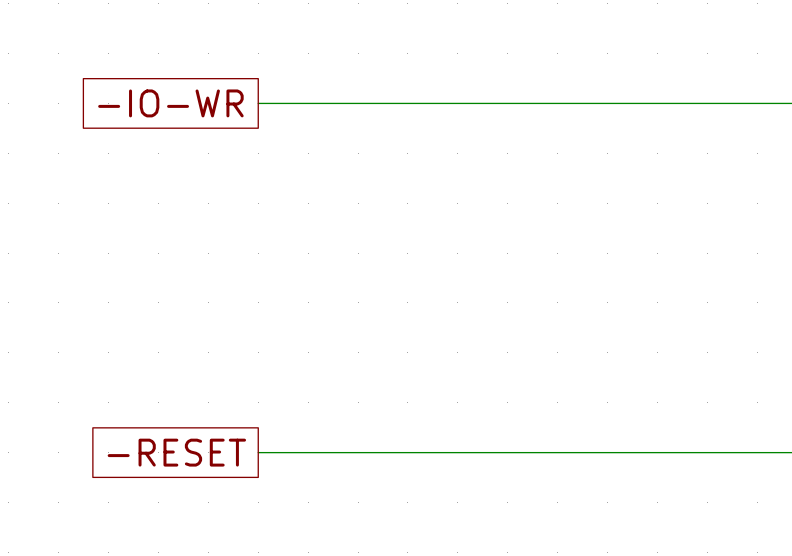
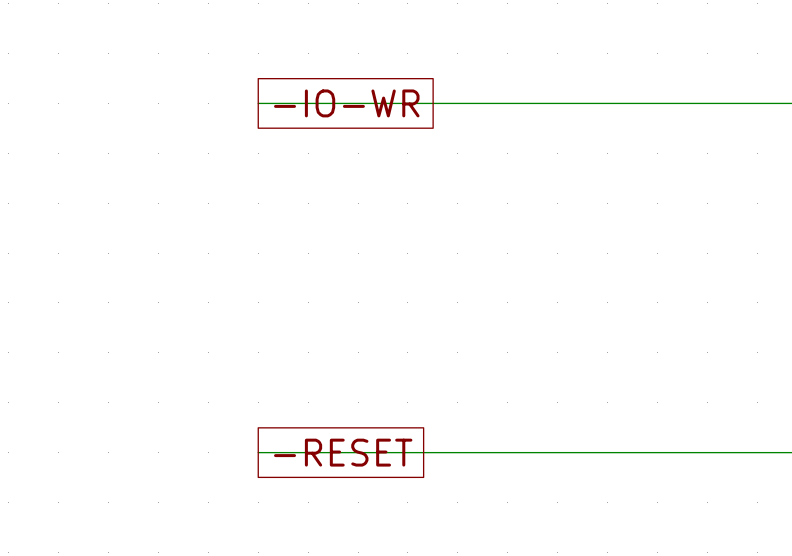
global label rotation: 0° (170, 103) -> 180° (346, 103)
global label rotation: 0° (176, 452) -> 180° (343, 452)

